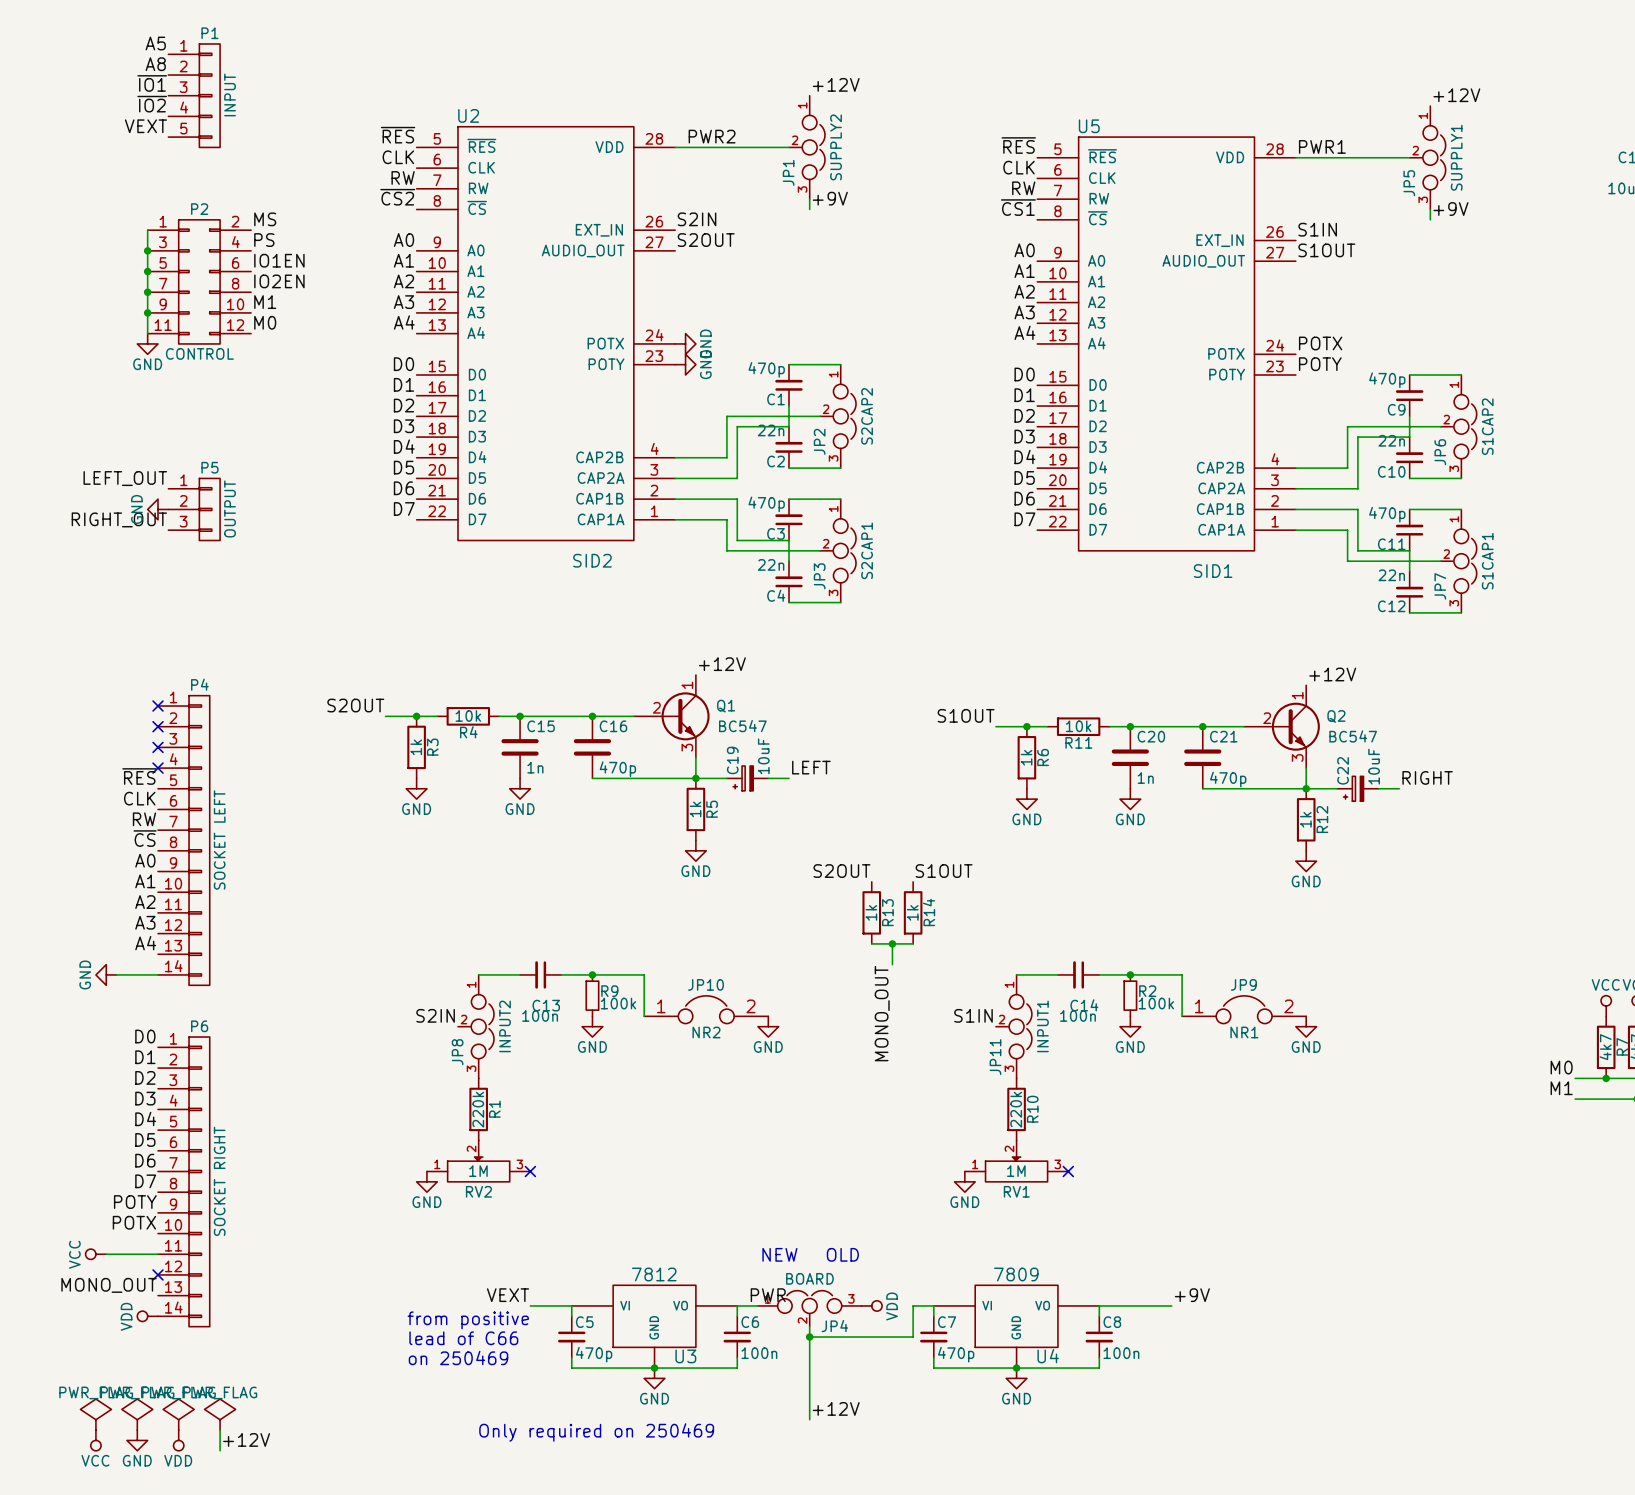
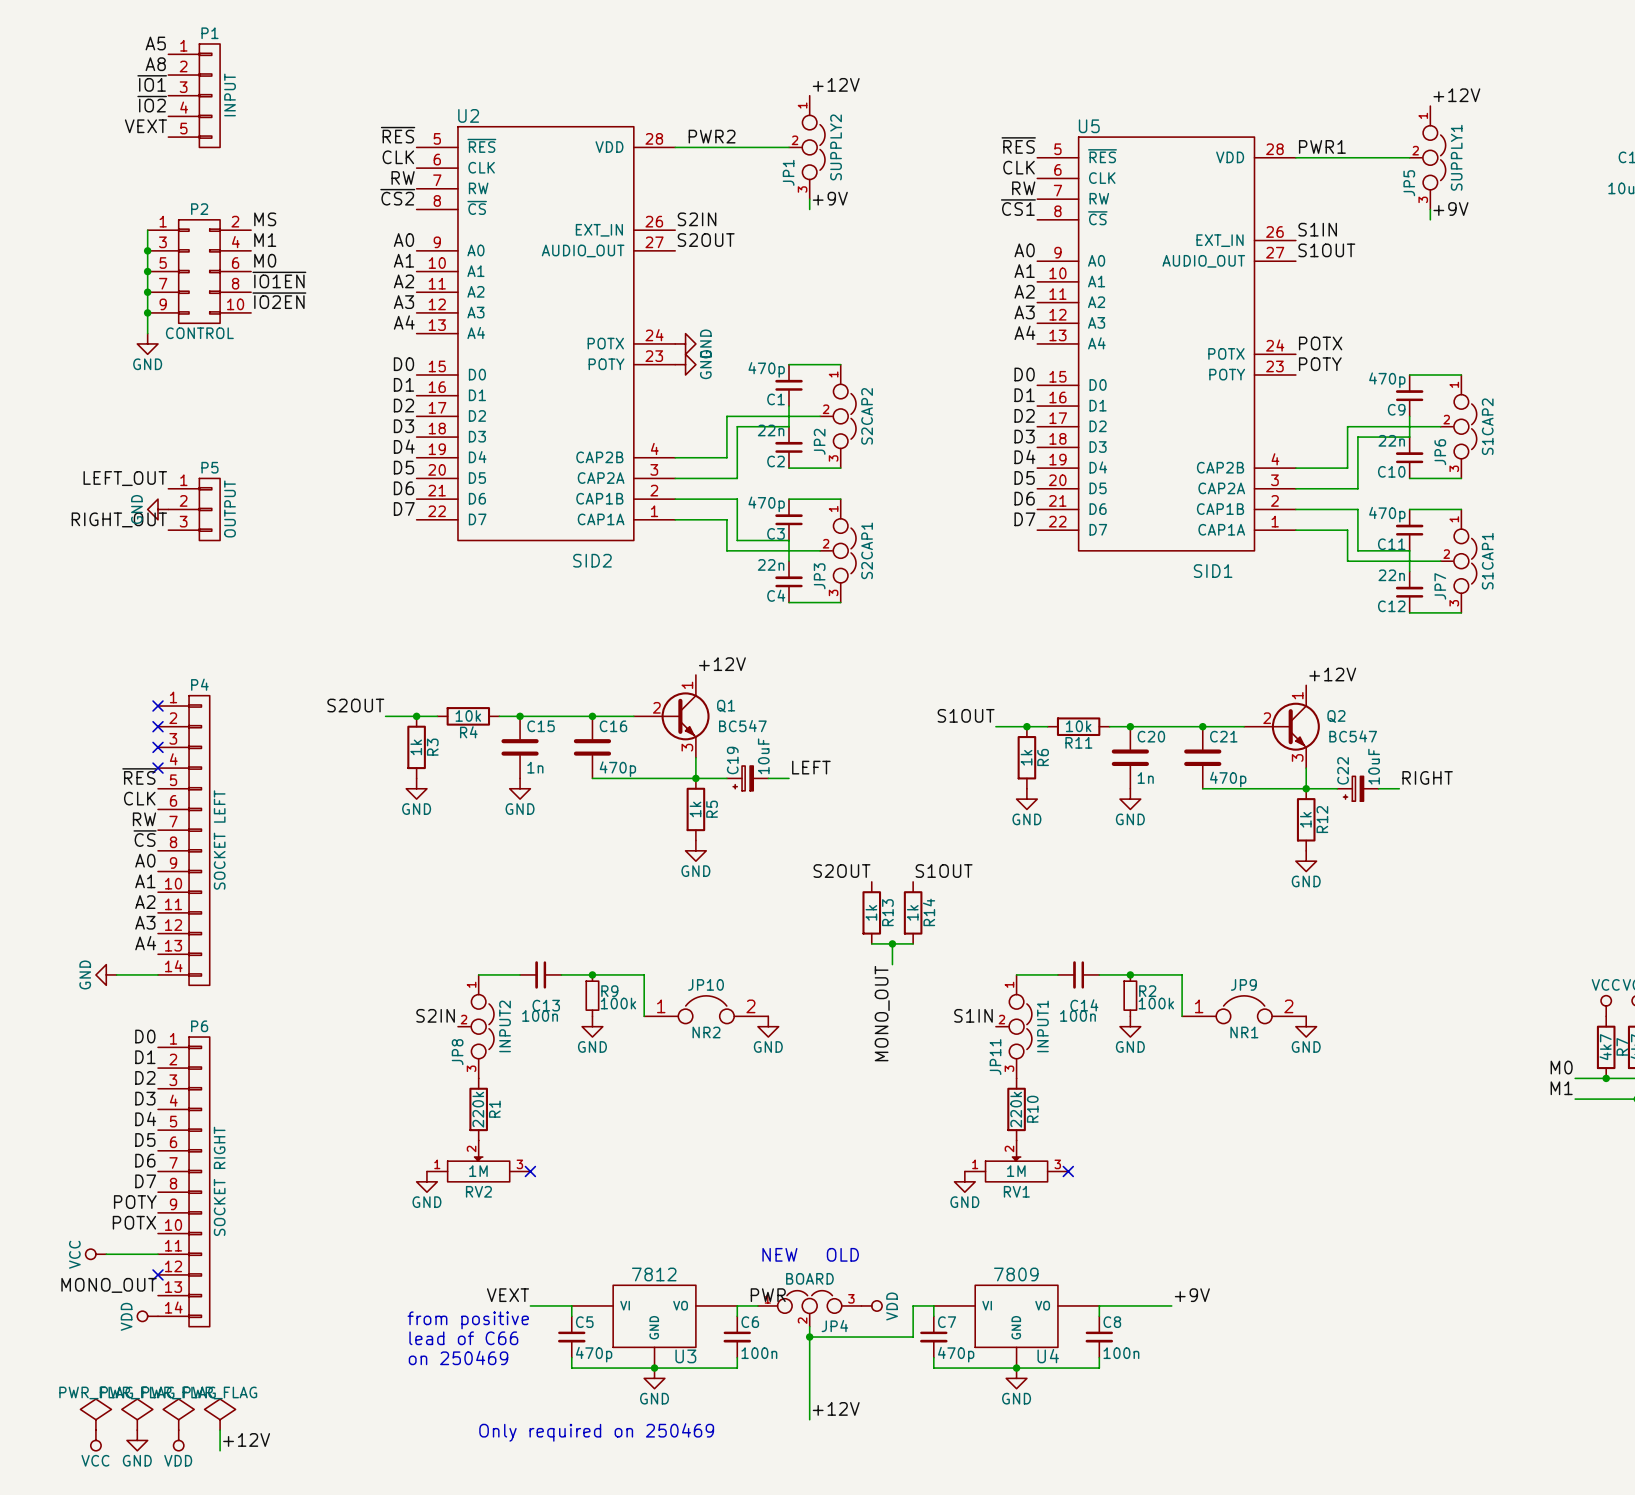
P2 symbol: [147, 219, 252, 344] -> [147, 219, 252, 324]
label: PS (264, 240) -> M1 (265, 240)
label: IO1EN (279, 260) -> M0 (265, 260)
label: IO2EN (279, 281) -> ~{IO1EN} (279, 279)
label: M1 (265, 302) -> ~{IO2EN} (279, 300)
label: M0 (265, 322) -> none

